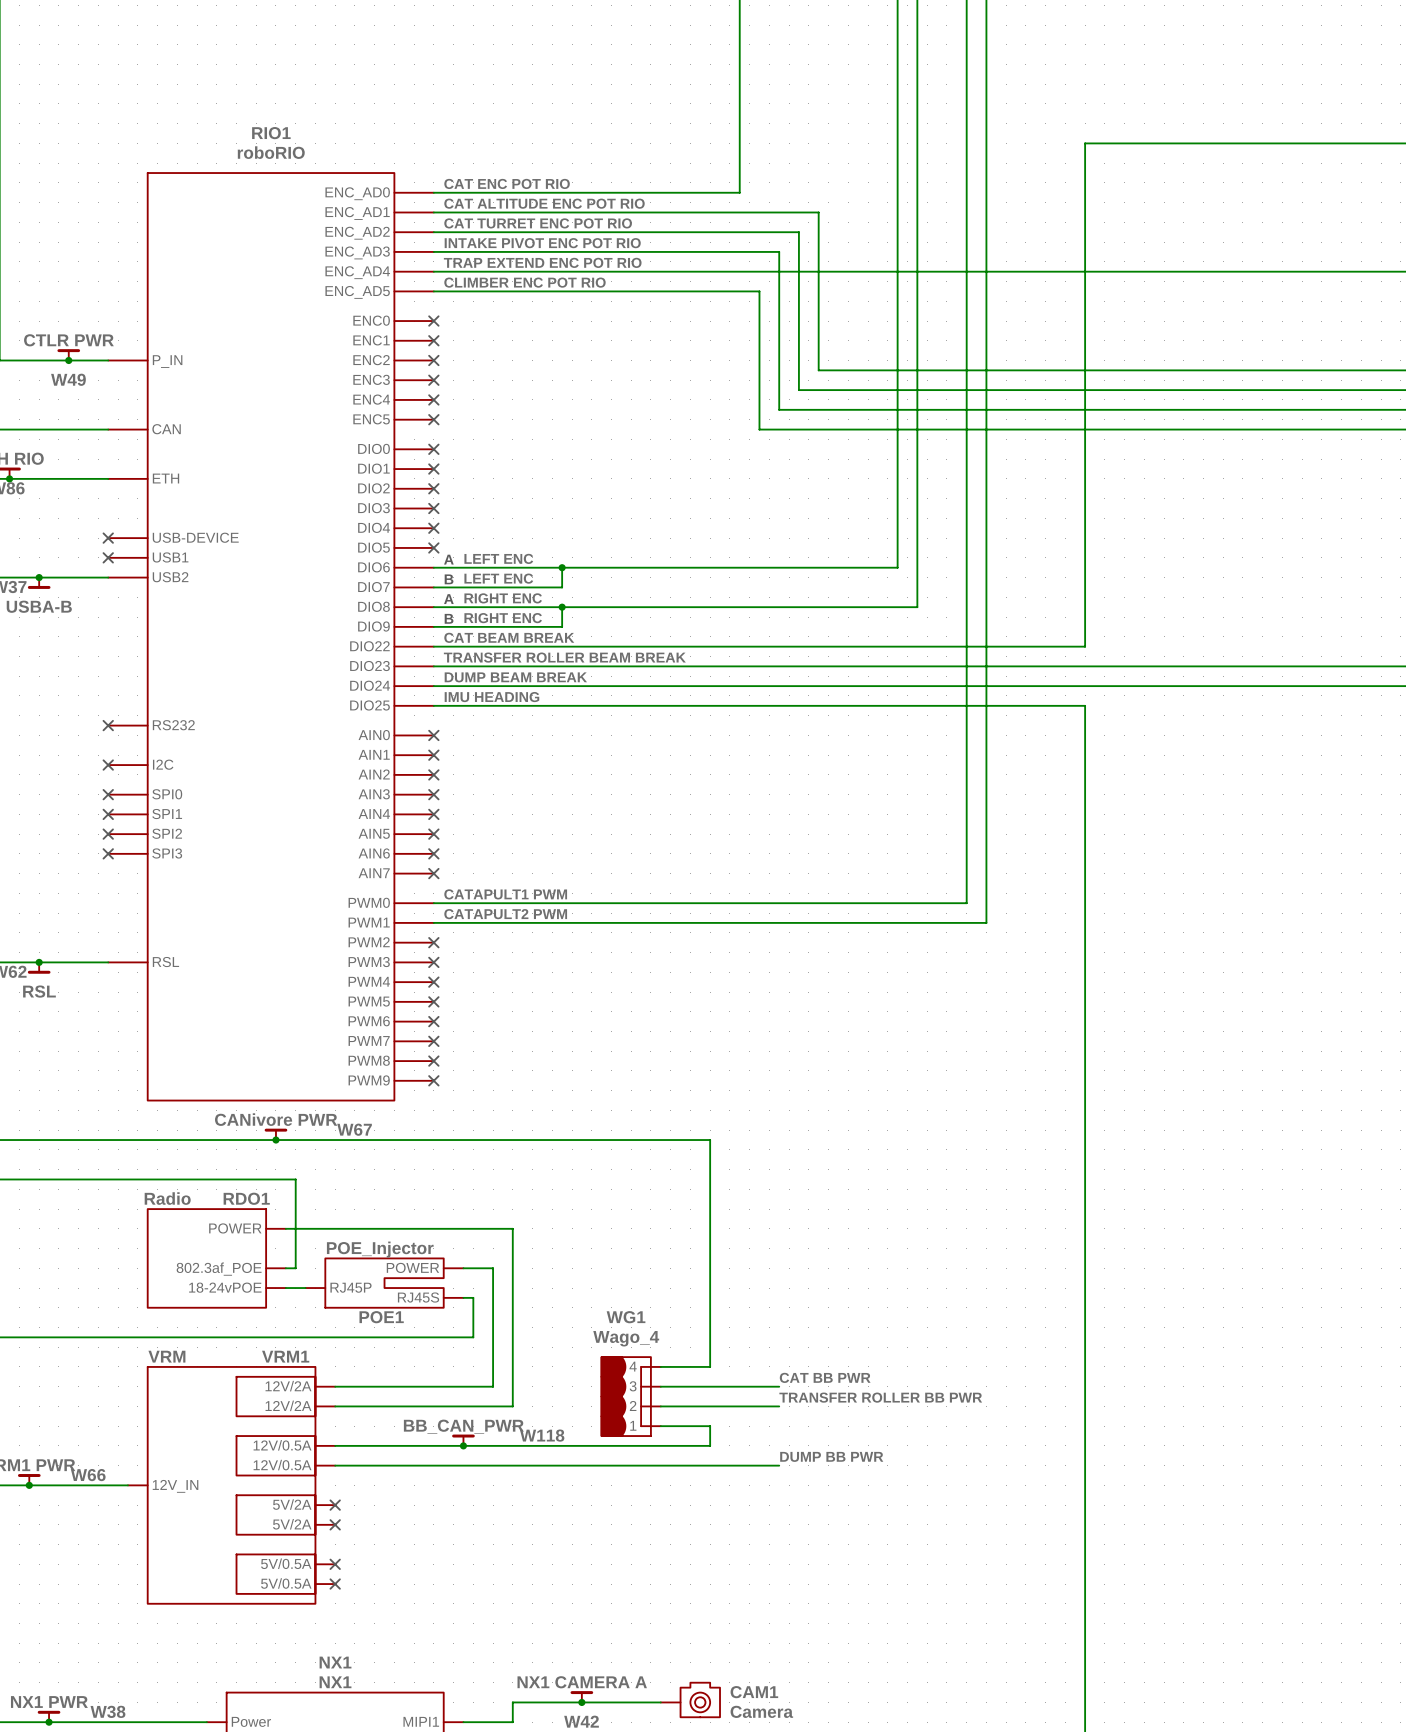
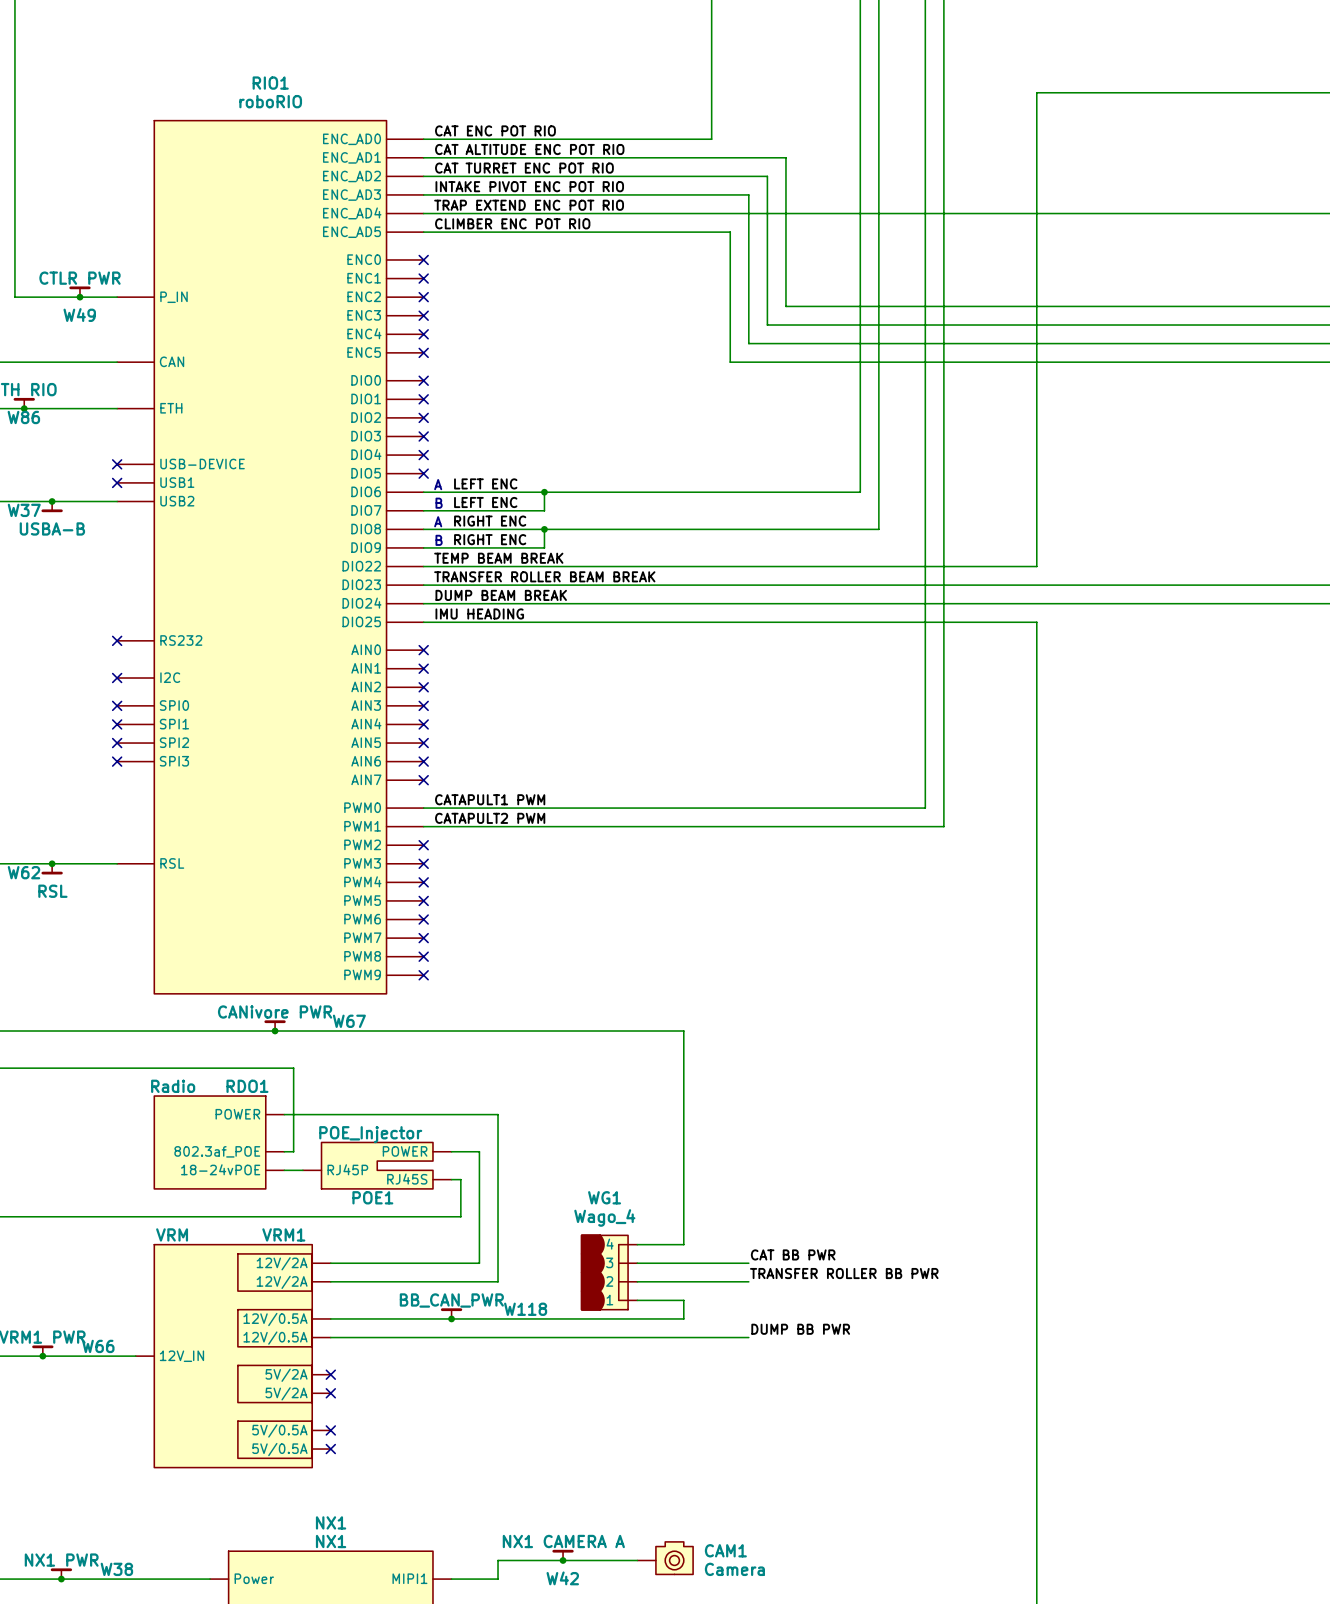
label: CAT BEAM BREAK (509, 637) -> TEMP BEAM BREAK (498, 558)

